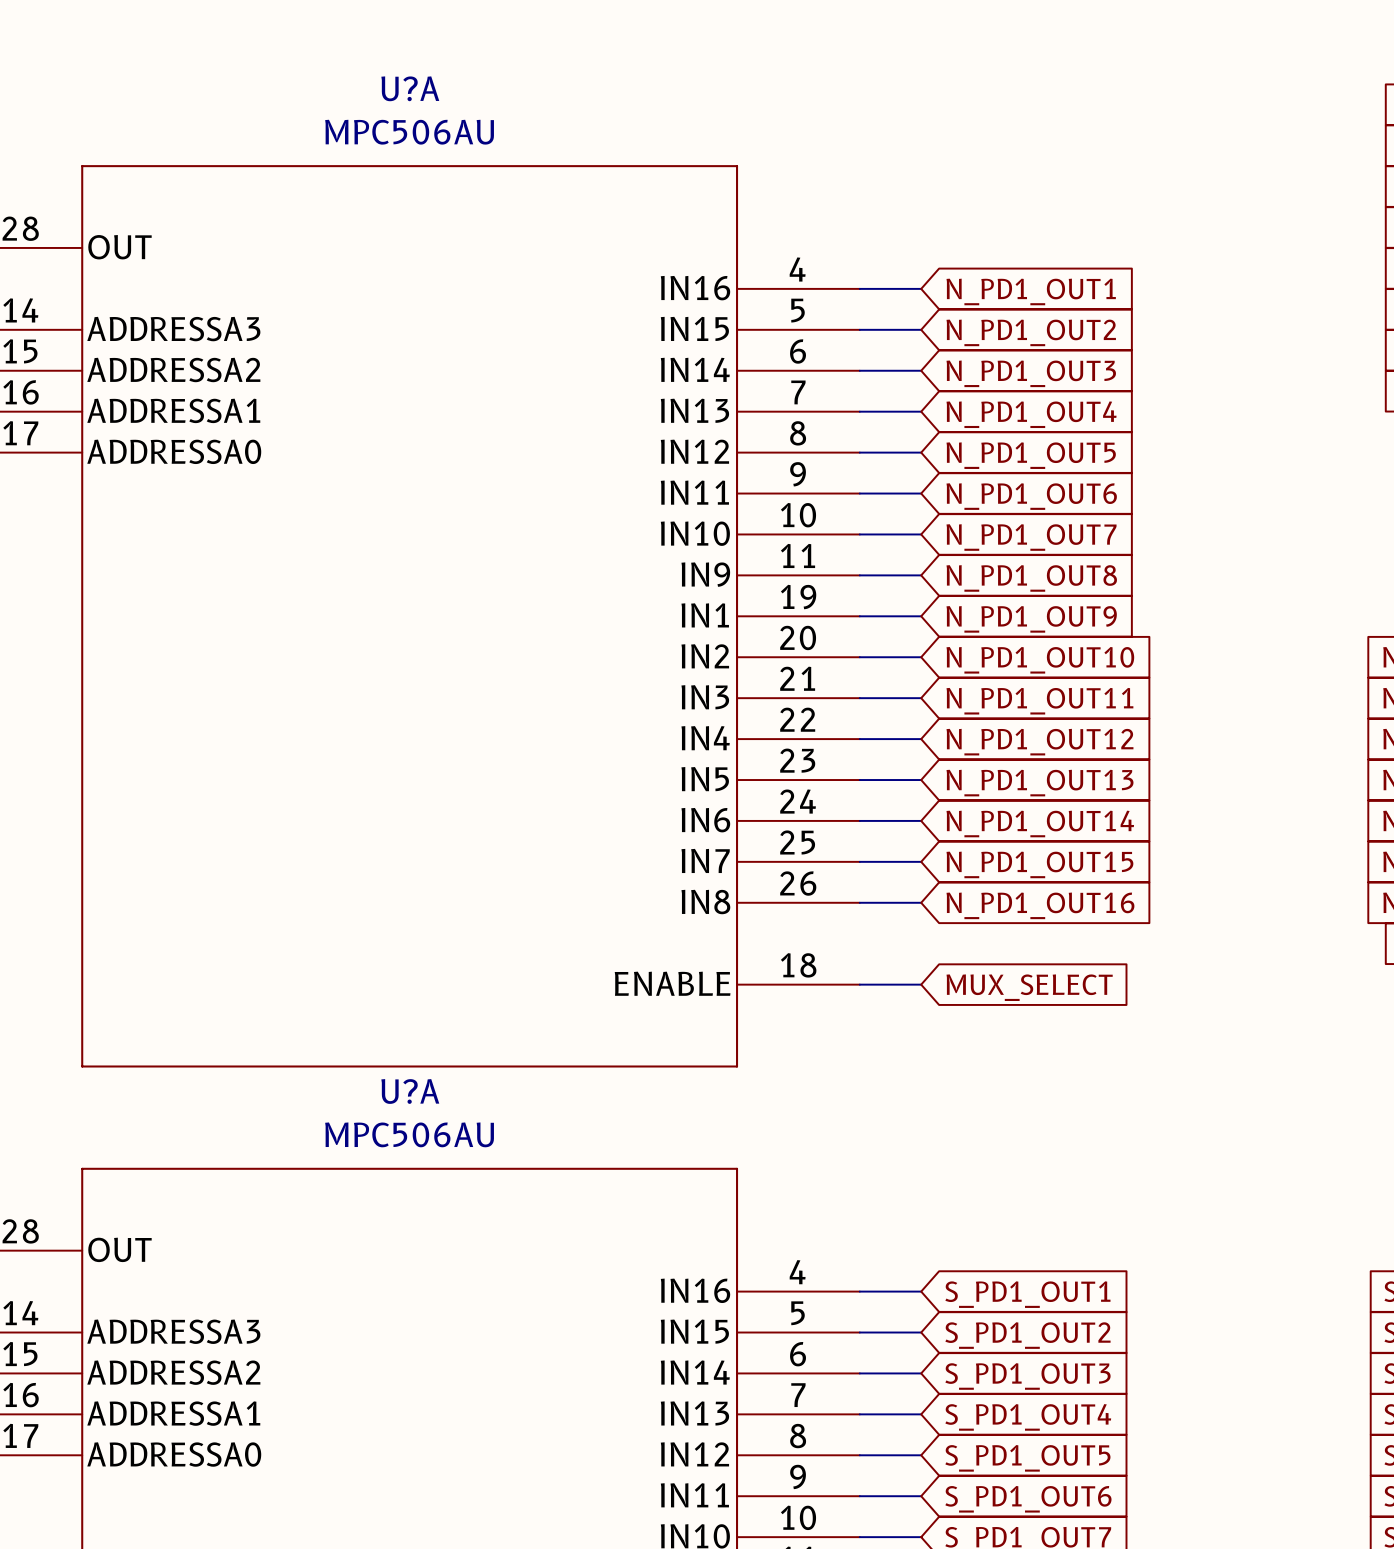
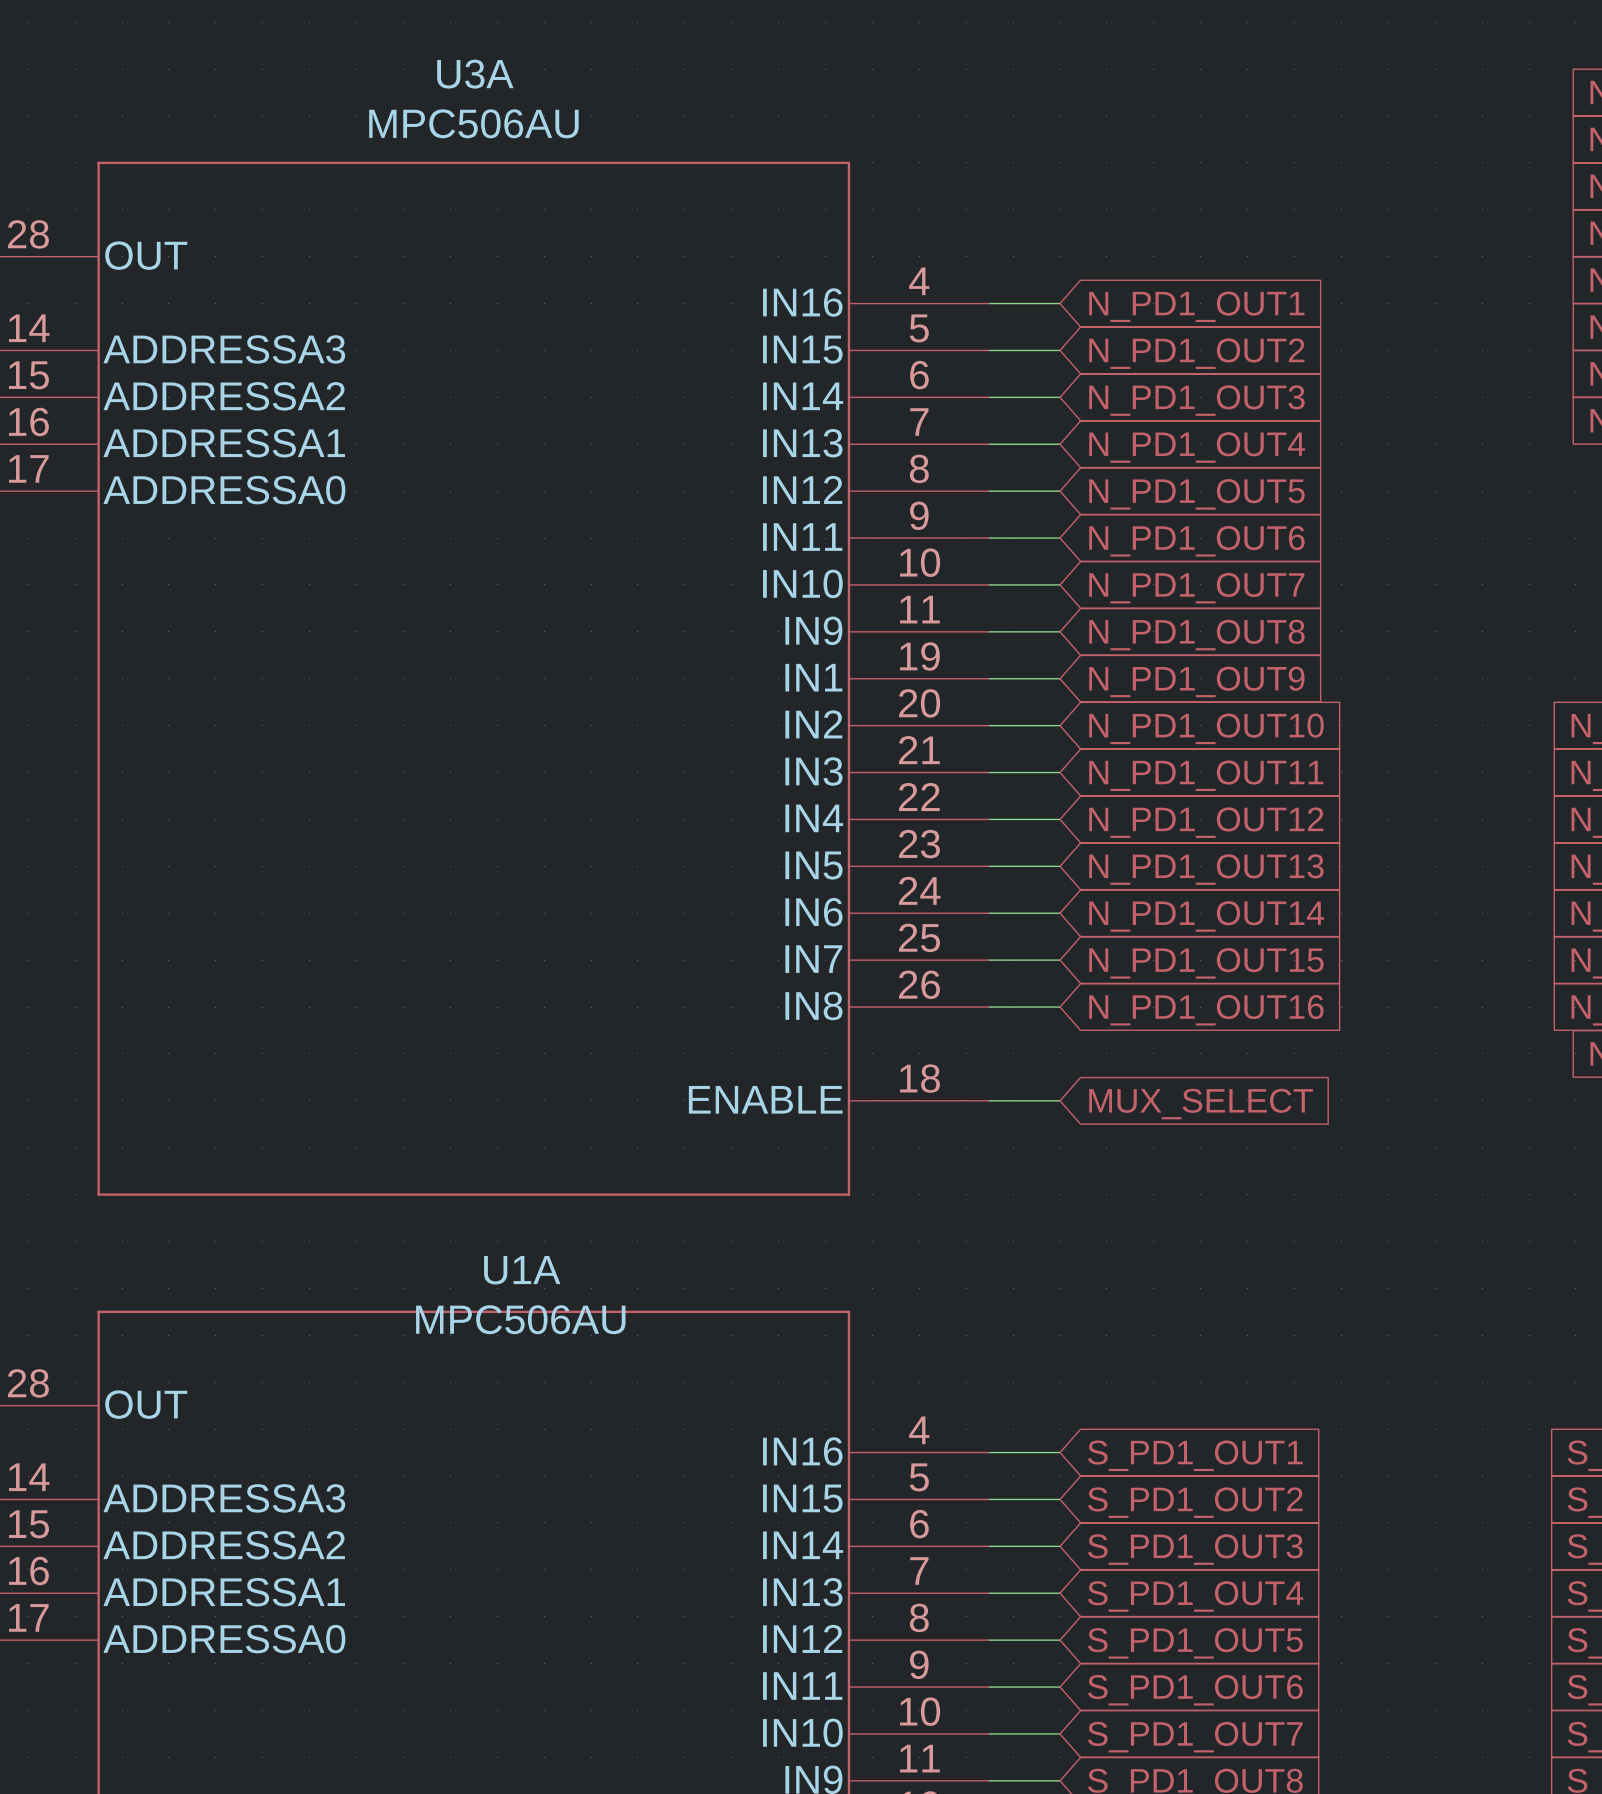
U?A name: U?A (410, 88) -> U3A (475, 74)
U?A name: U?A (410, 1091) -> U1A (522, 1270)
U?A value position: MPC506AU (409, 1134) -> MPC506AU (520, 1319)

